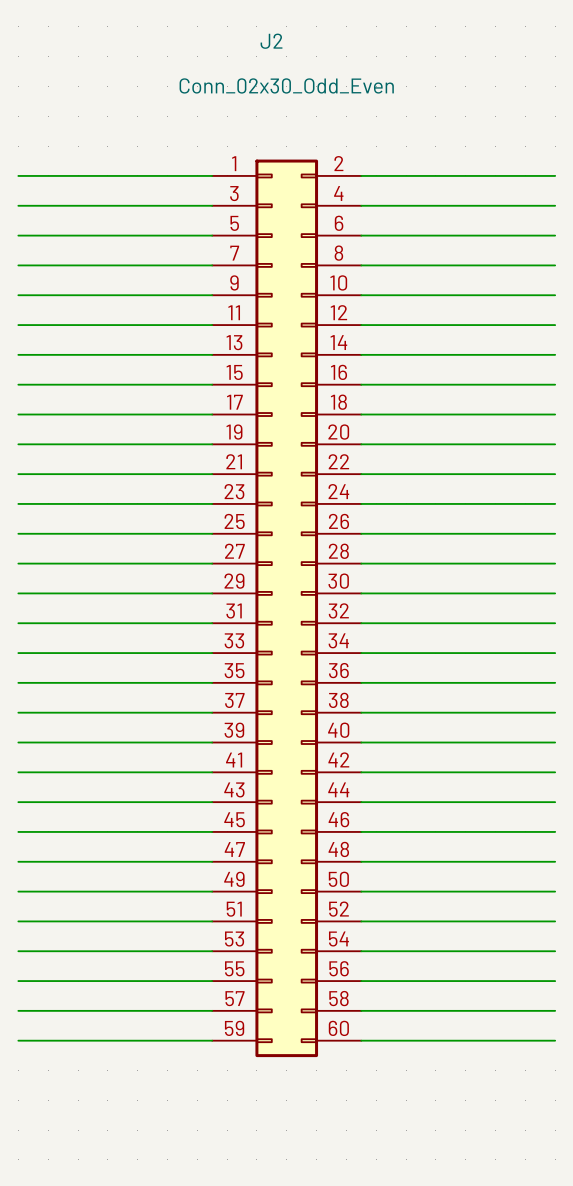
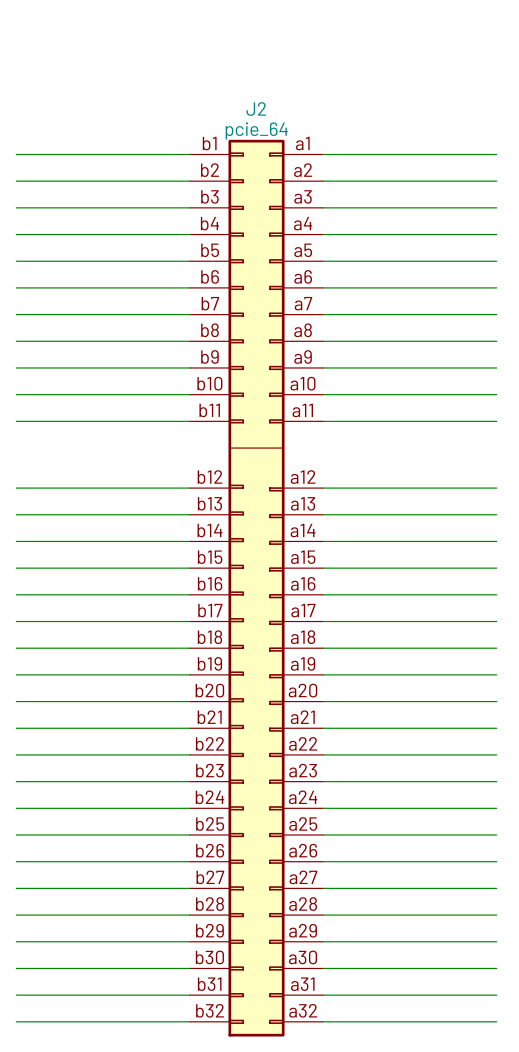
J2 name position: J2 (271, 41) -> J2 (256, 109)
J2 value: Conn_02x30_Odd_Even (286, 85) -> pcie_64 (256, 130)
J2 symbol: [212, 159, 362, 1058] -> [189, 139, 324, 1037]
wire: (18, 503) (212, 503) -> (16, 488) (189, 488)
wire: (361, 503) (555, 503) -> (323, 488) (496, 488)
wire: (18, 533) (212, 533) -> (16, 514) (189, 514)
wire: (361, 533) (555, 533) -> (323, 514) (496, 514)
wire: (18, 563) (212, 563) -> (16, 541) (189, 541)
wire: (361, 563) (555, 563) -> (323, 541) (496, 541)
wire: (18, 593) (212, 593) -> (16, 568) (189, 568)
wire: (361, 593) (555, 593) -> (323, 568) (496, 568)
wire: (18, 623) (212, 623) -> (16, 594) (189, 594)
wire: (361, 623) (555, 623) -> (323, 594) (496, 594)
wire: (18, 653) (212, 653) -> (16, 621) (189, 621)
wire: (361, 653) (555, 653) -> (323, 621) (496, 621)
wire: (18, 682) (212, 682) -> (16, 648) (189, 648)
wire: (361, 682) (555, 682) -> (323, 648) (496, 648)
wire: (18, 712) (212, 712) -> (16, 674) (189, 674)
wire: (361, 712) (555, 712) -> (323, 674) (496, 674)
wire: (18, 742) (212, 742) -> (16, 701) (189, 701)
wire: (361, 742) (555, 742) -> (323, 701) (496, 701)
wire: (18, 772) (212, 772) -> (16, 728) (189, 728)
wire: (361, 772) (555, 772) -> (323, 728) (496, 728)
wire: (18, 802) (212, 802) -> (16, 754) (189, 754)
wire: (361, 802) (555, 802) -> (323, 754) (496, 754)
wire: (18, 831) (212, 831) -> (16, 781) (189, 781)
wire: (361, 831) (555, 831) -> (323, 781) (496, 781)
wire: (18, 861) (212, 861) -> (16, 808) (189, 808)
wire: (361, 861) (555, 861) -> (323, 808) (496, 808)
wire: (18, 891) (212, 891) -> (16, 835) (189, 835)
wire: (361, 891) (555, 891) -> (323, 835) (496, 835)
wire: (18, 921) (212, 921) -> (16, 861) (189, 861)
wire: (361, 921) (555, 921) -> (323, 861) (496, 861)
wire: (18, 951) (212, 951) -> (16, 888) (189, 888)
wire: (361, 951) (555, 951) -> (323, 888) (496, 888)
wire: (18, 981) (212, 981) -> (16, 915) (189, 915)
wire: (361, 981) (555, 981) -> (323, 915) (496, 915)
wire: (18, 1010) (212, 1010) -> (16, 941) (189, 941)
wire: (361, 1010) (555, 1010) -> (323, 941) (496, 941)
wire: (18, 1040) (212, 1040) -> (16, 968) (189, 968)
wire: (361, 1040) (555, 1040) -> (323, 968) (496, 968)
wire: none -> (16, 995) (189, 995)
wire: none -> (323, 995) (496, 995)
wire: none -> (16, 1021) (189, 1021)
wire: none -> (323, 1021) (496, 1021)

